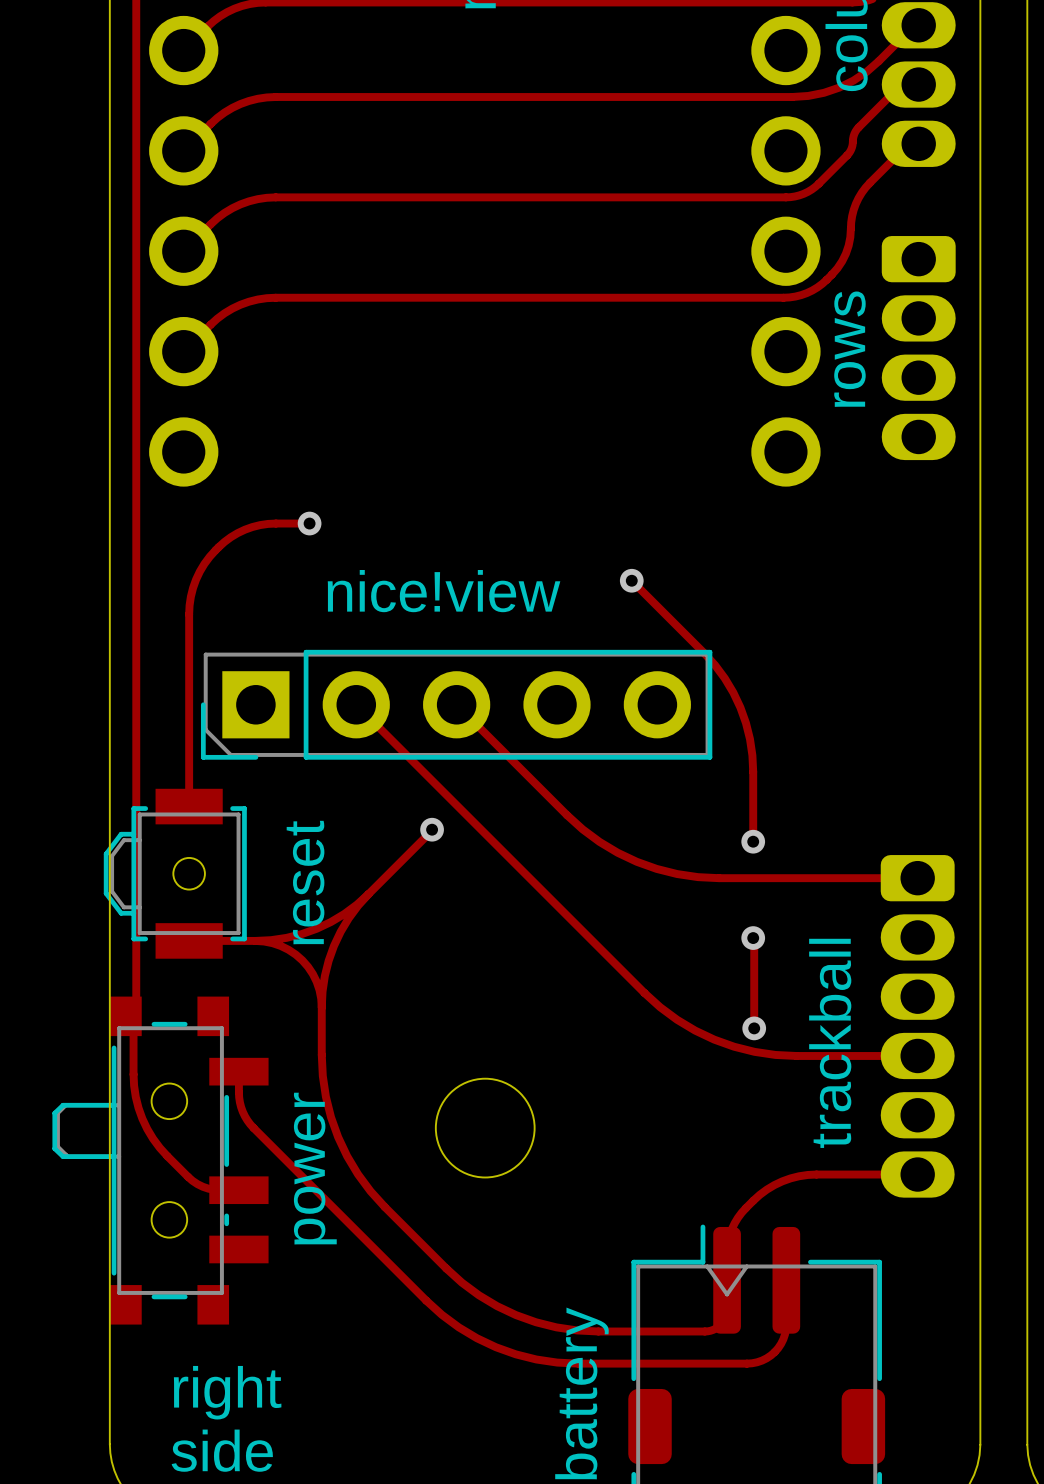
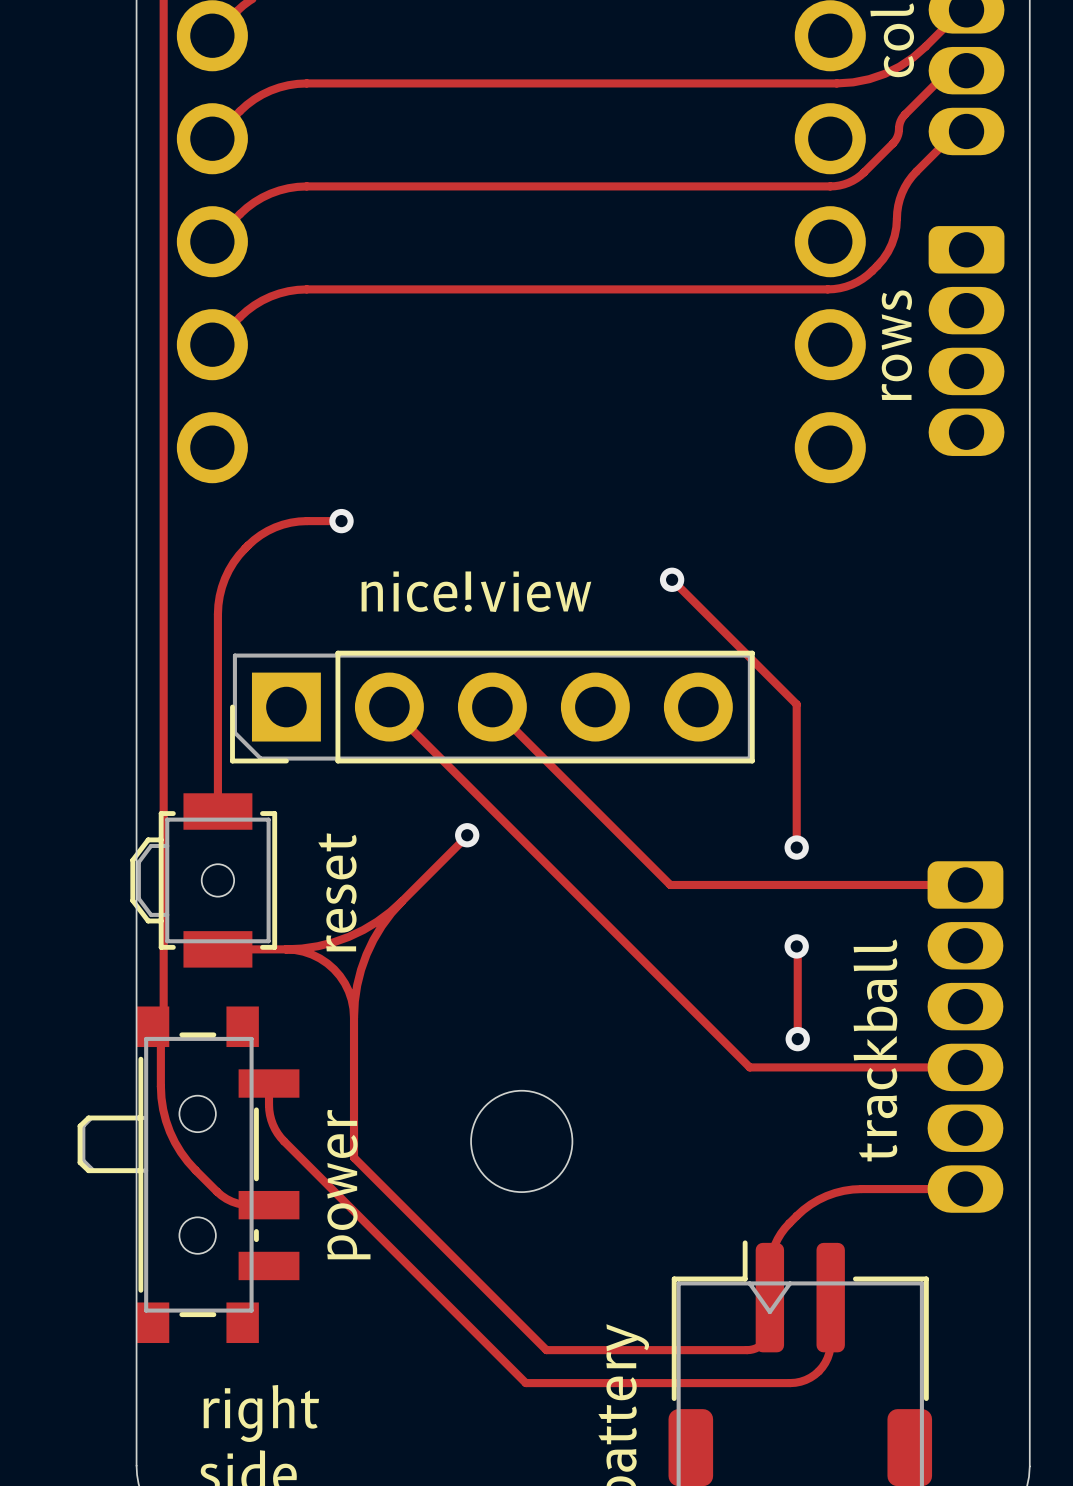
track: (703, 652) (724, 678) (740, 707) (749, 739) (753, 771) -> (746, 653) (796, 704) (796, 775)
track: (567, 815) (599, 841) (636, 861) (677, 874) (719, 878) -> (605, 820) (670, 884) (761, 884)
track: (644, 993) (677, 1019) (714, 1039) (754, 1051) (796, 1055) -> (685, 1002) (749, 1067) (841, 1067)
track: (321, 1054) (325, 1096) (338, 1137) (358, 1174) (384, 1206) -> (354, 1066) (354, 1157) (418, 1222)
track: (446, 1268) (478, 1295) (516, 1315) (556, 1327) (598, 1331) -> (481, 1285) (546, 1350) (637, 1350)
track: (426, 1300) (458, 1327) (496, 1347) (536, 1359) (578, 1363) -> (461, 1318) (525, 1383) (617, 1383)

